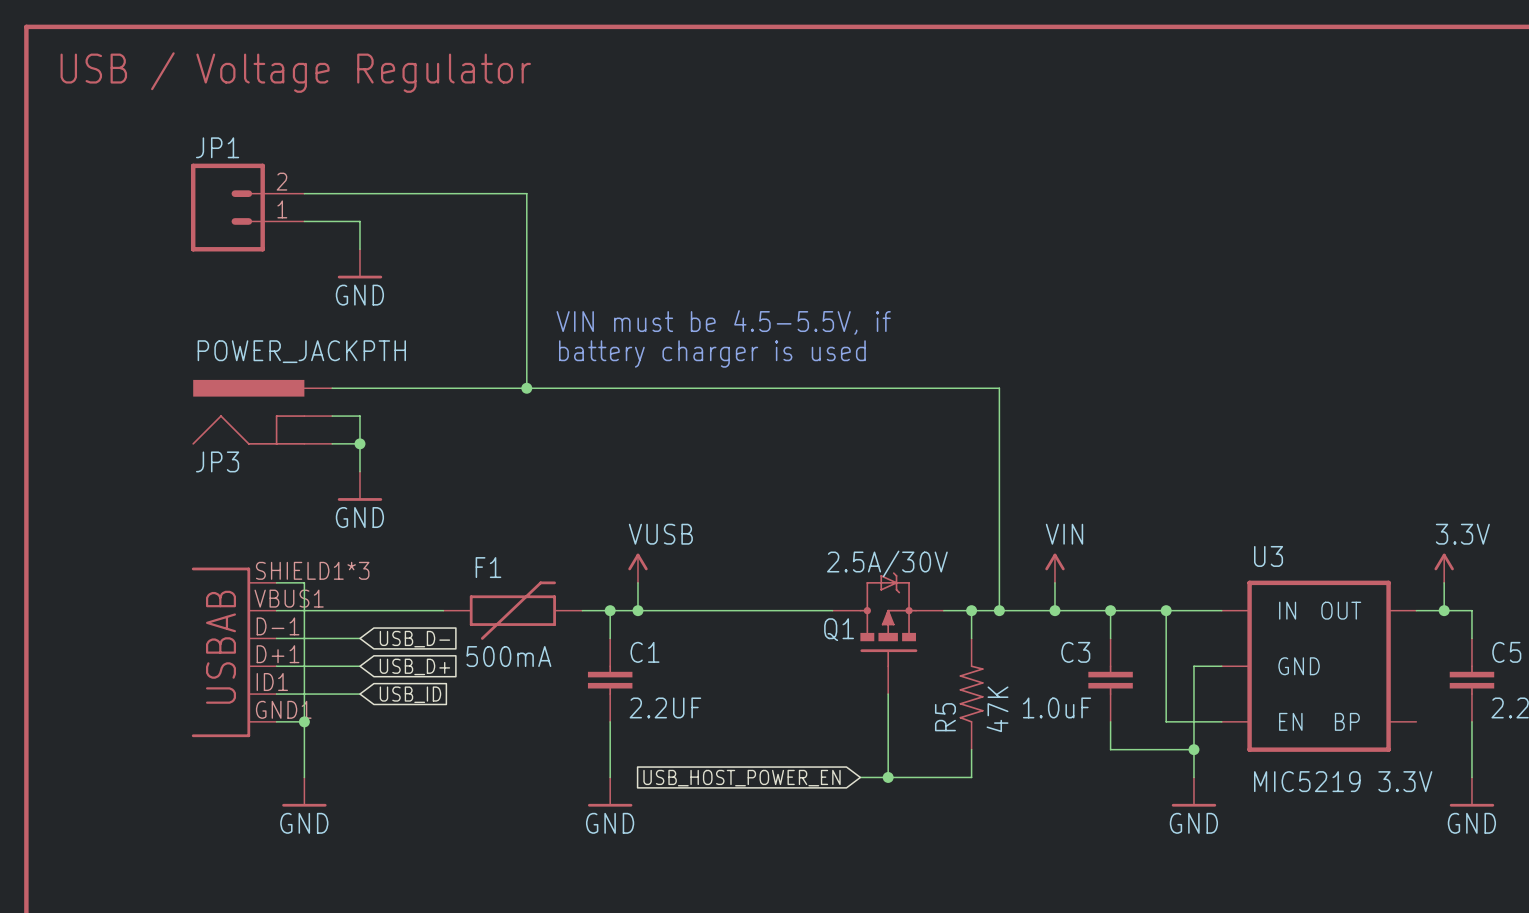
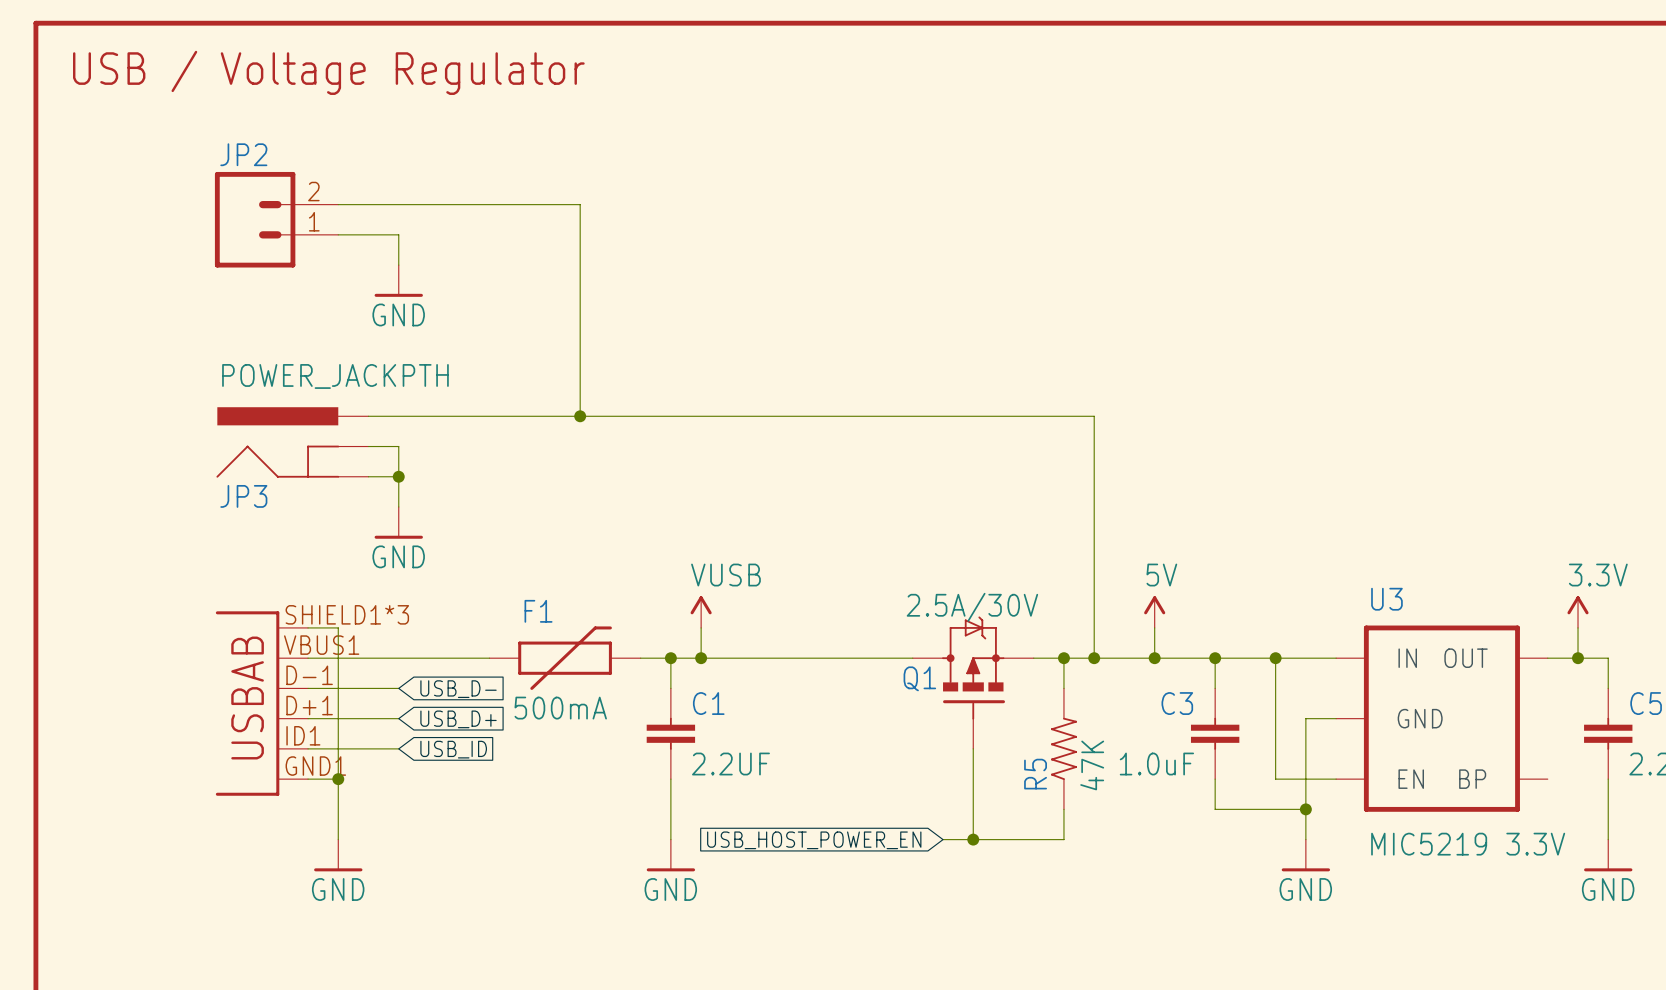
JP1 name: JP1 (217, 147) -> JP2 (243, 154)
text: VIN must be 4.5-5.5V, if (723, 322) -> none
text: battery charger is used (712, 353) -> none
power symbol: VIN (1054, 568) -> 5V (1154, 612)

